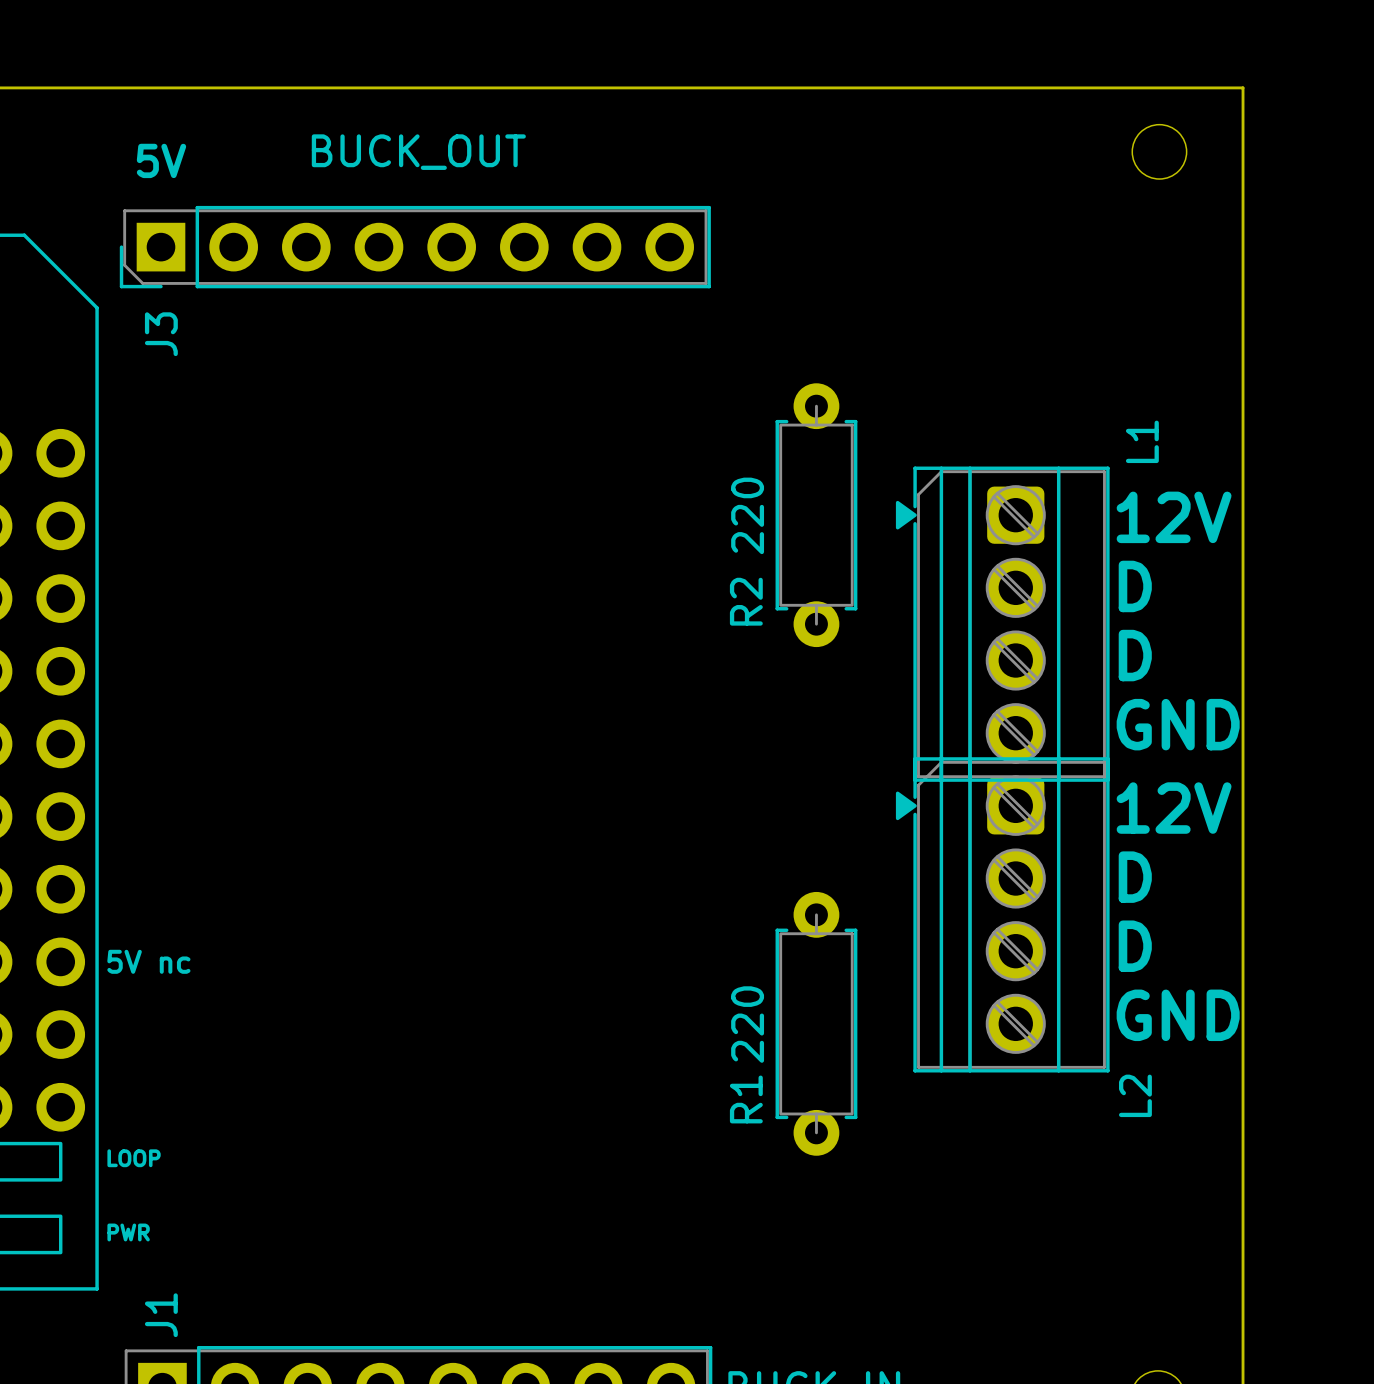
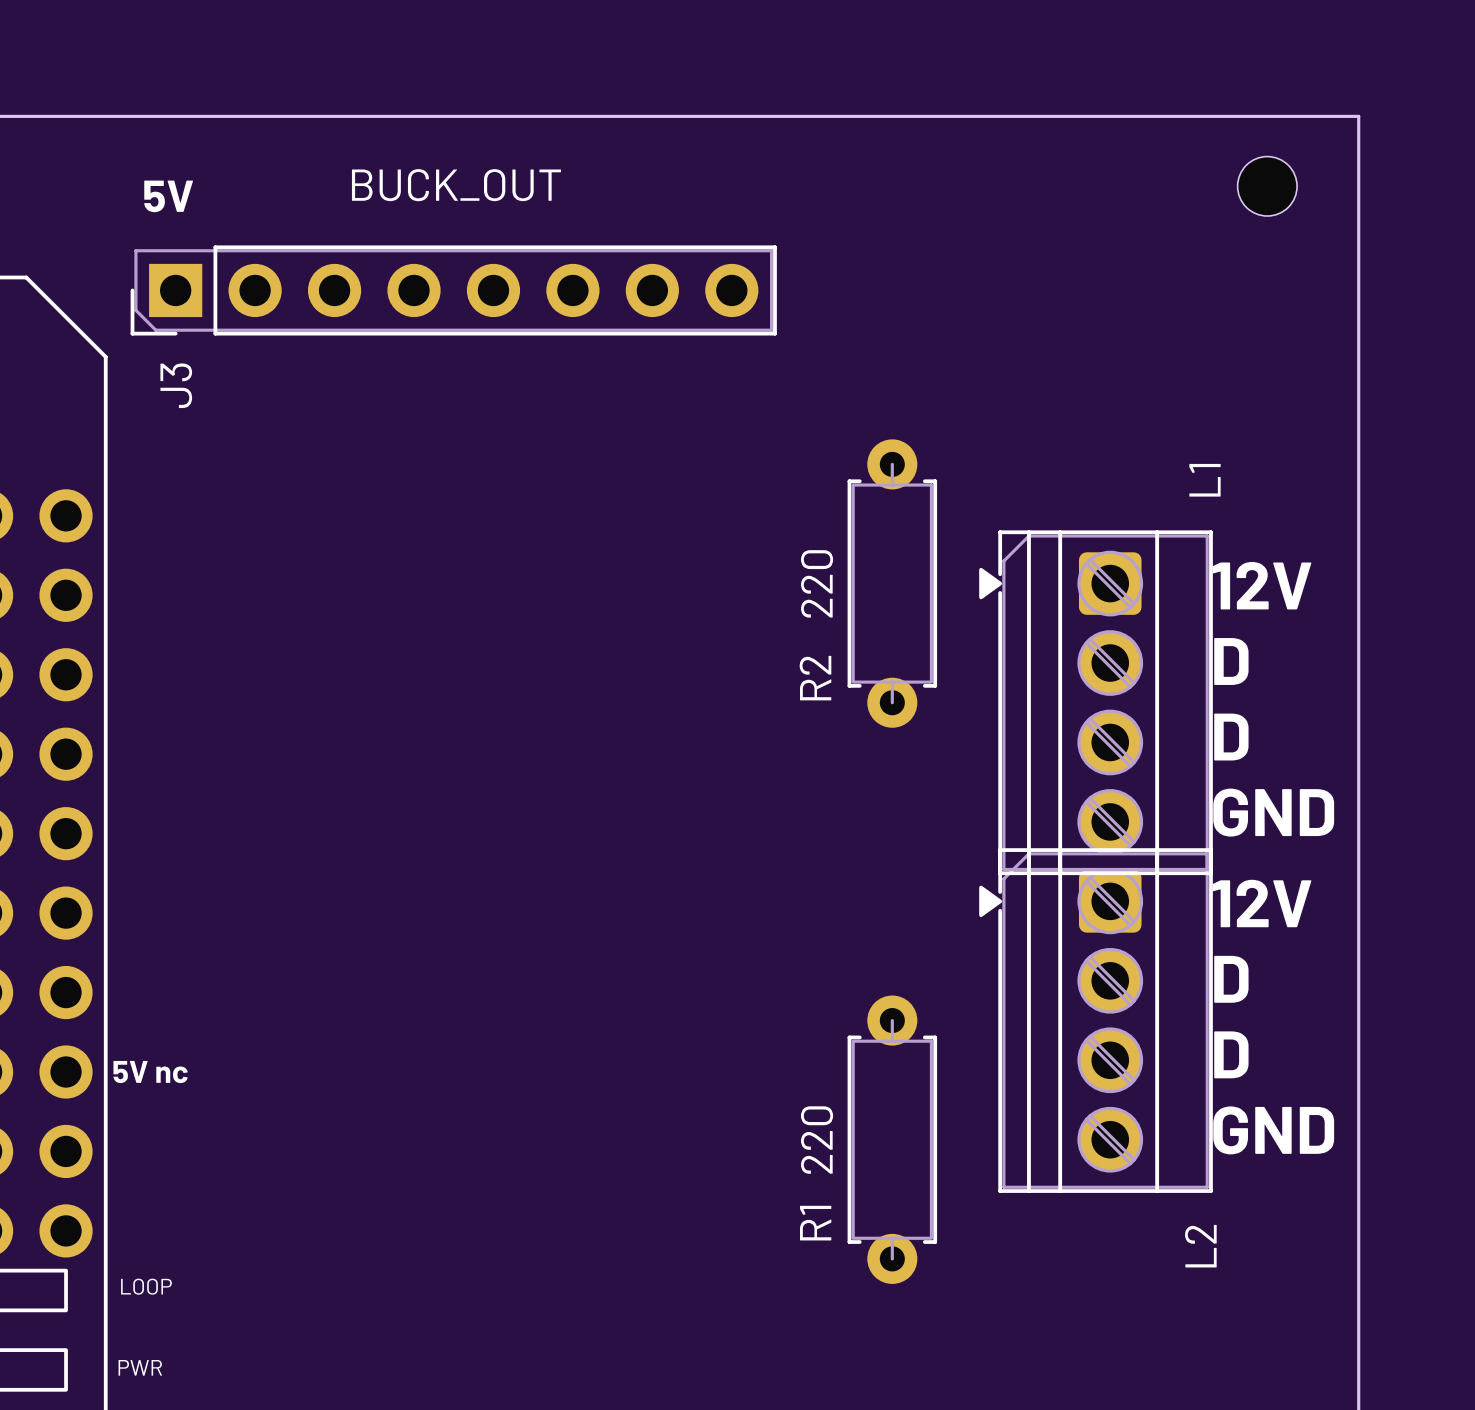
L1 name position: L1 (1142, 441) -> L1 (1204, 480)
L2 name position: L2 (1135, 1095) -> L2 (1200, 1246)

